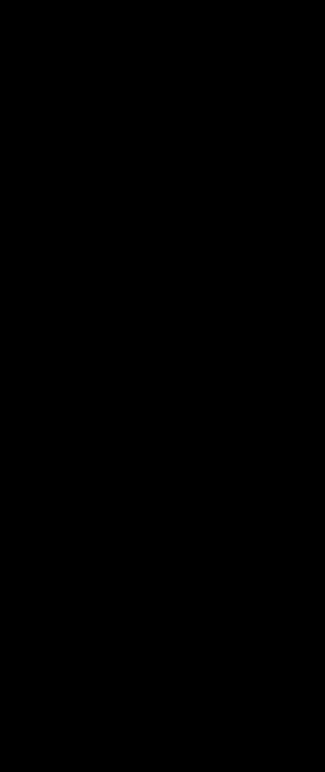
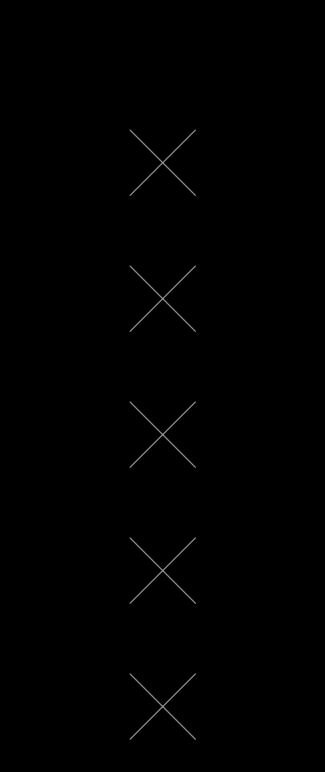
no-connect mark: none -> (162, 162)
no-connect mark: none -> (162, 298)
no-connect mark: none -> (162, 434)
no-connect mark: none -> (162, 570)
no-connect mark: none -> (162, 706)

